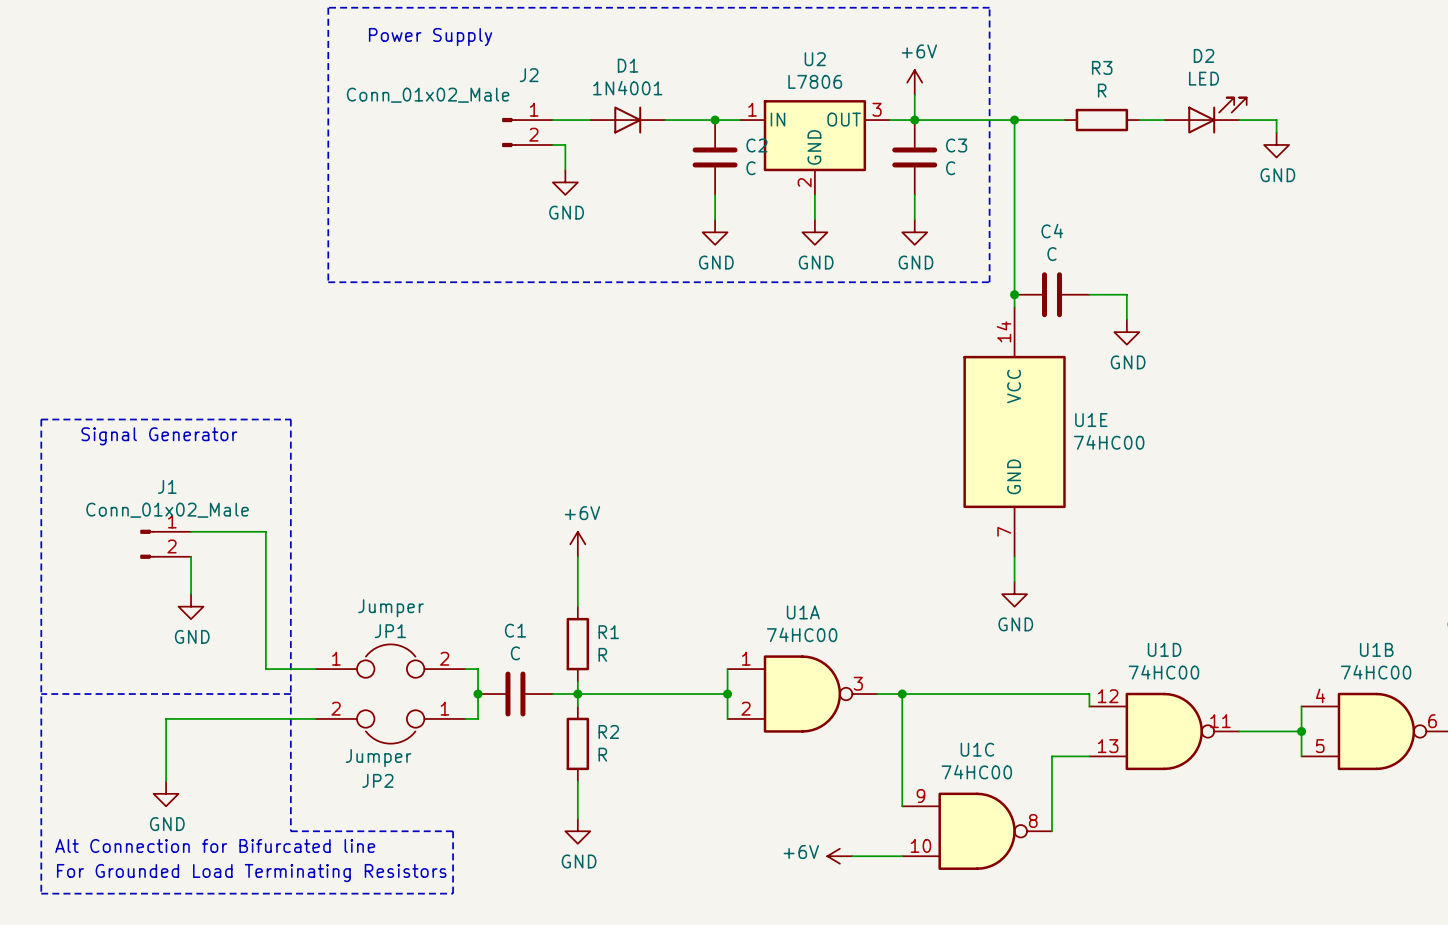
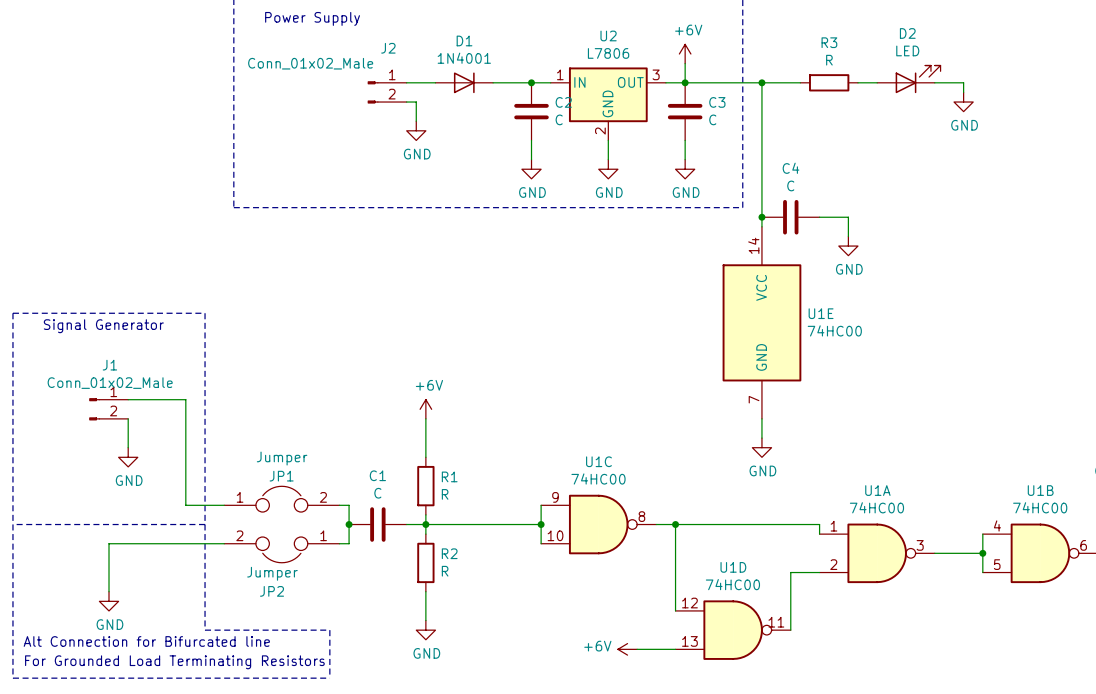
U1A position: (802, 694) -> (877, 553)
U1D position: (1164, 731) -> (733, 630)
U1C position: (977, 831) -> (598, 524)

